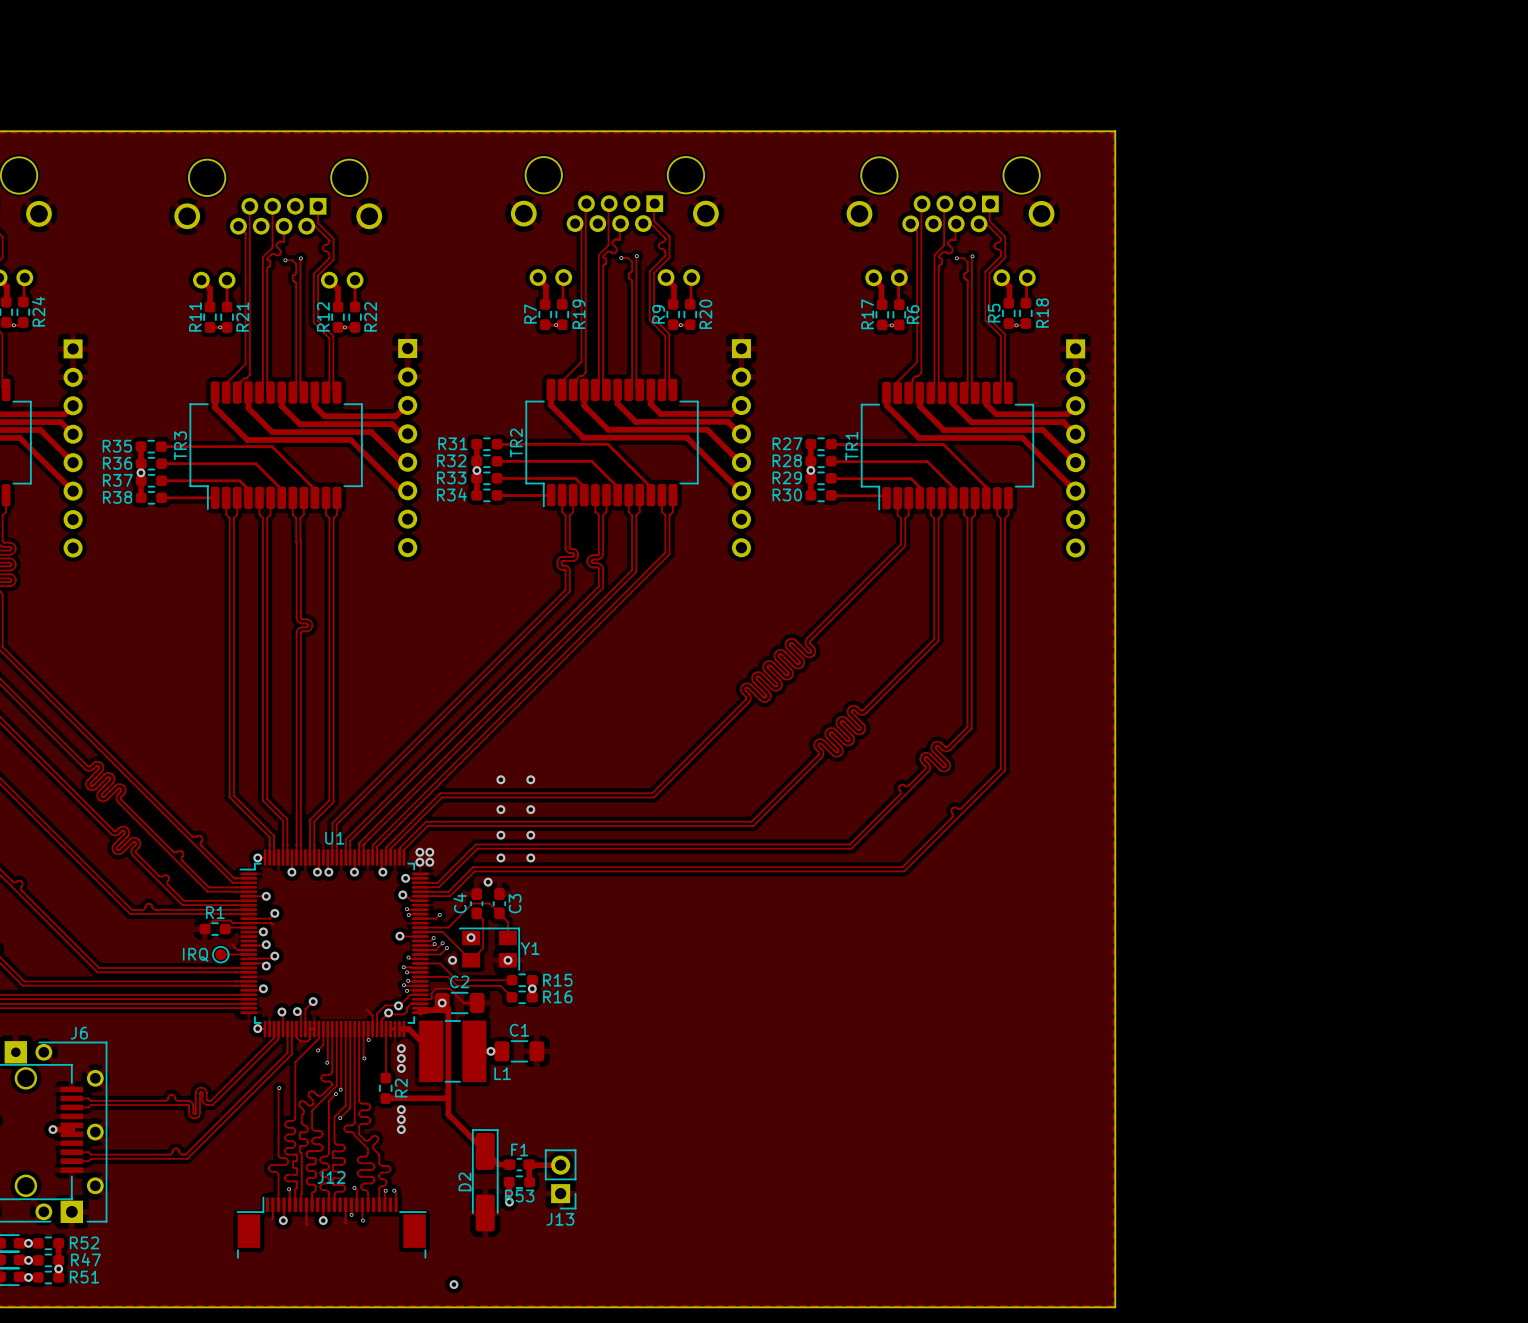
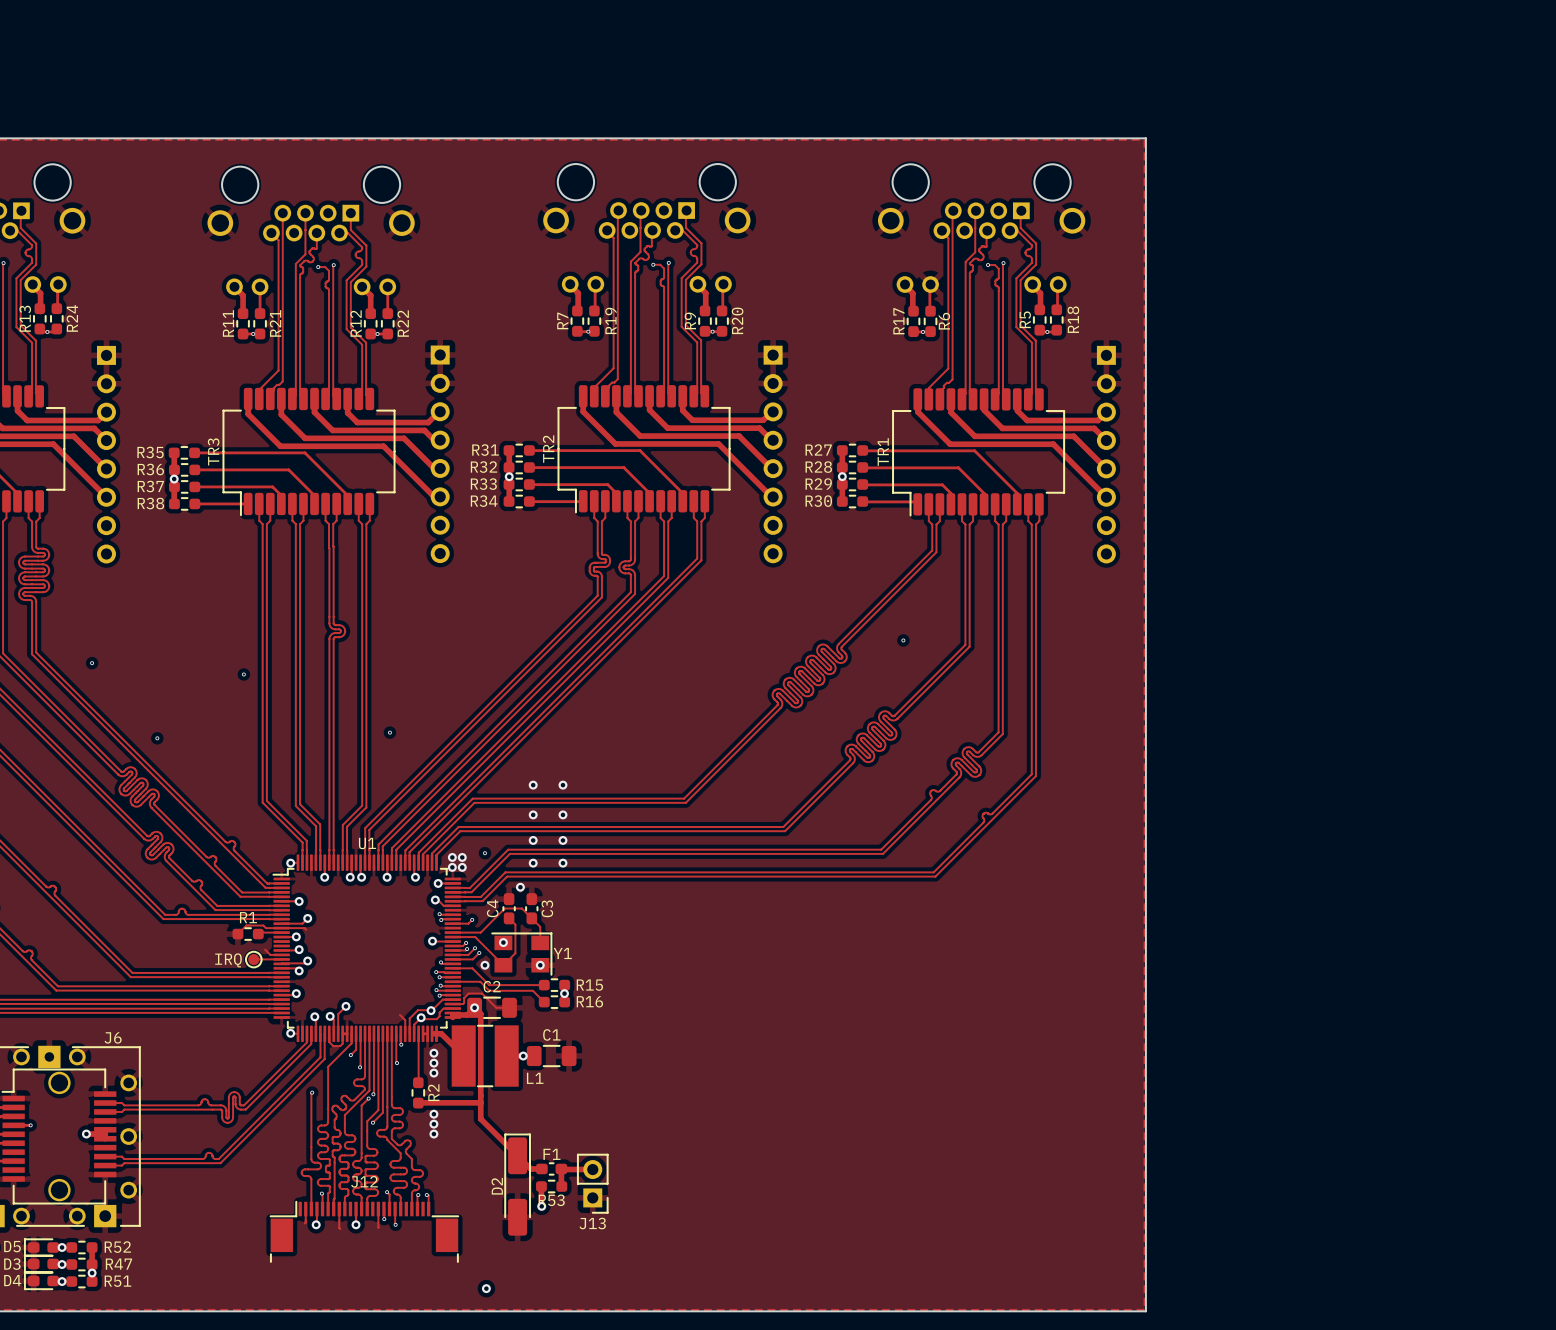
via: none -> (903, 640)
via: none -> (92, 663)
via: none -> (243, 674)
via: none -> (389, 732)
via: none -> (157, 738)
via: none -> (484, 853)

